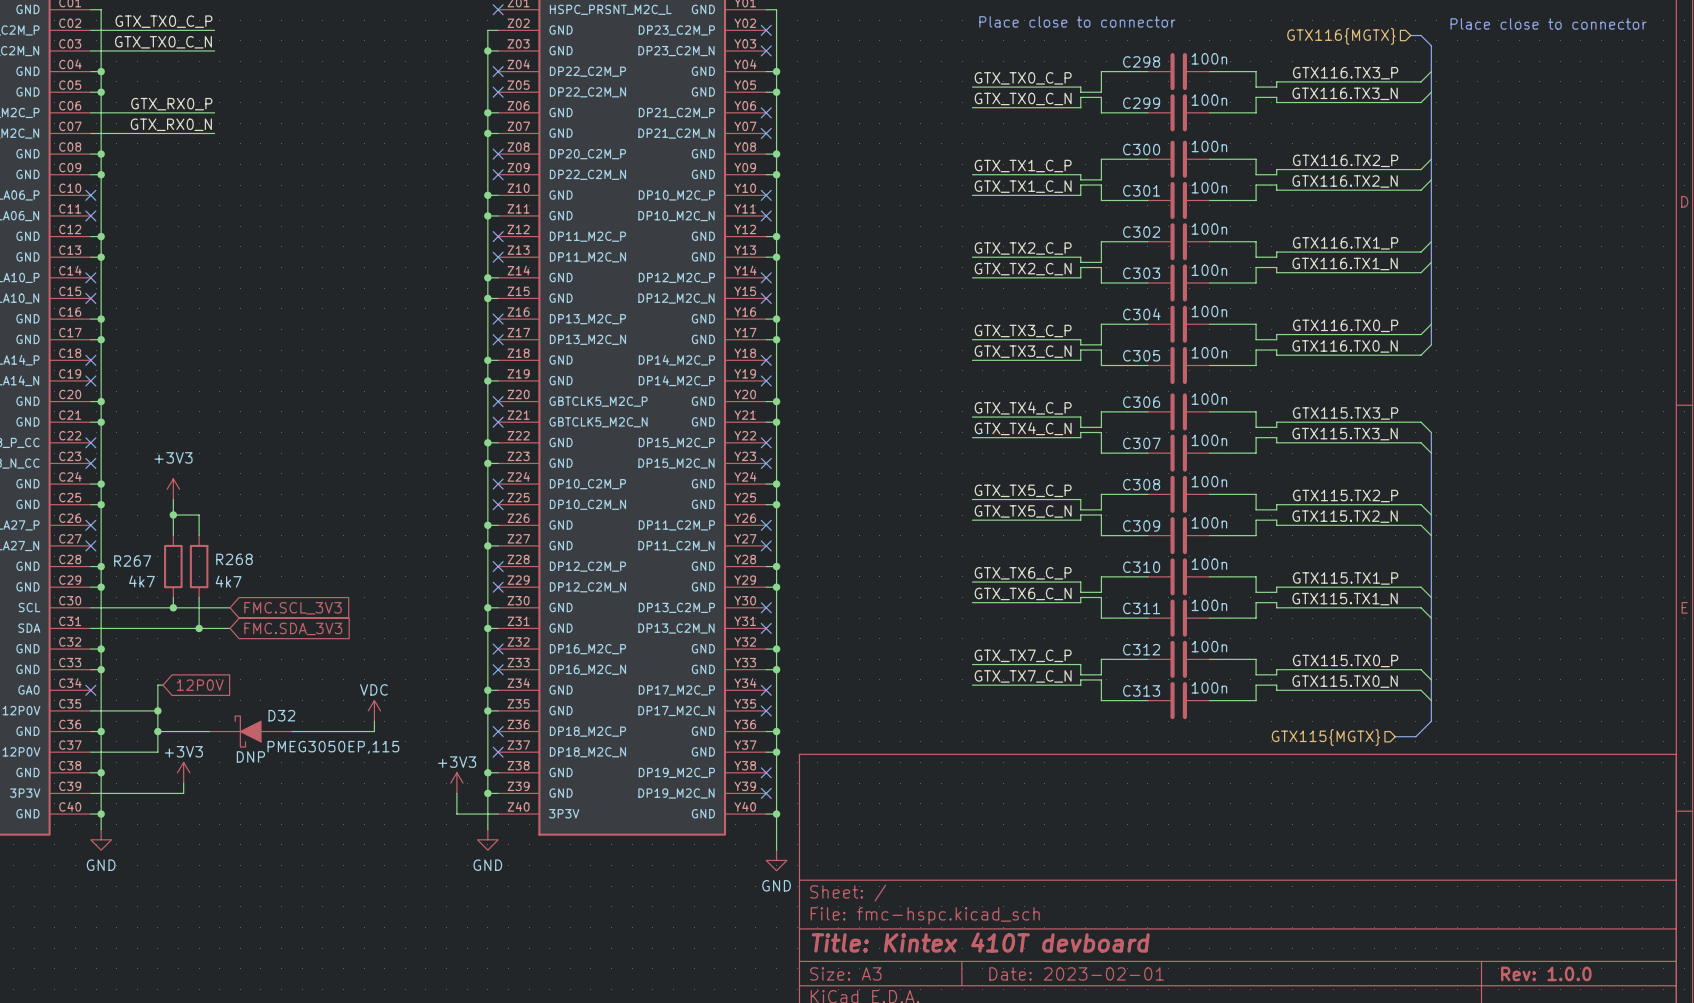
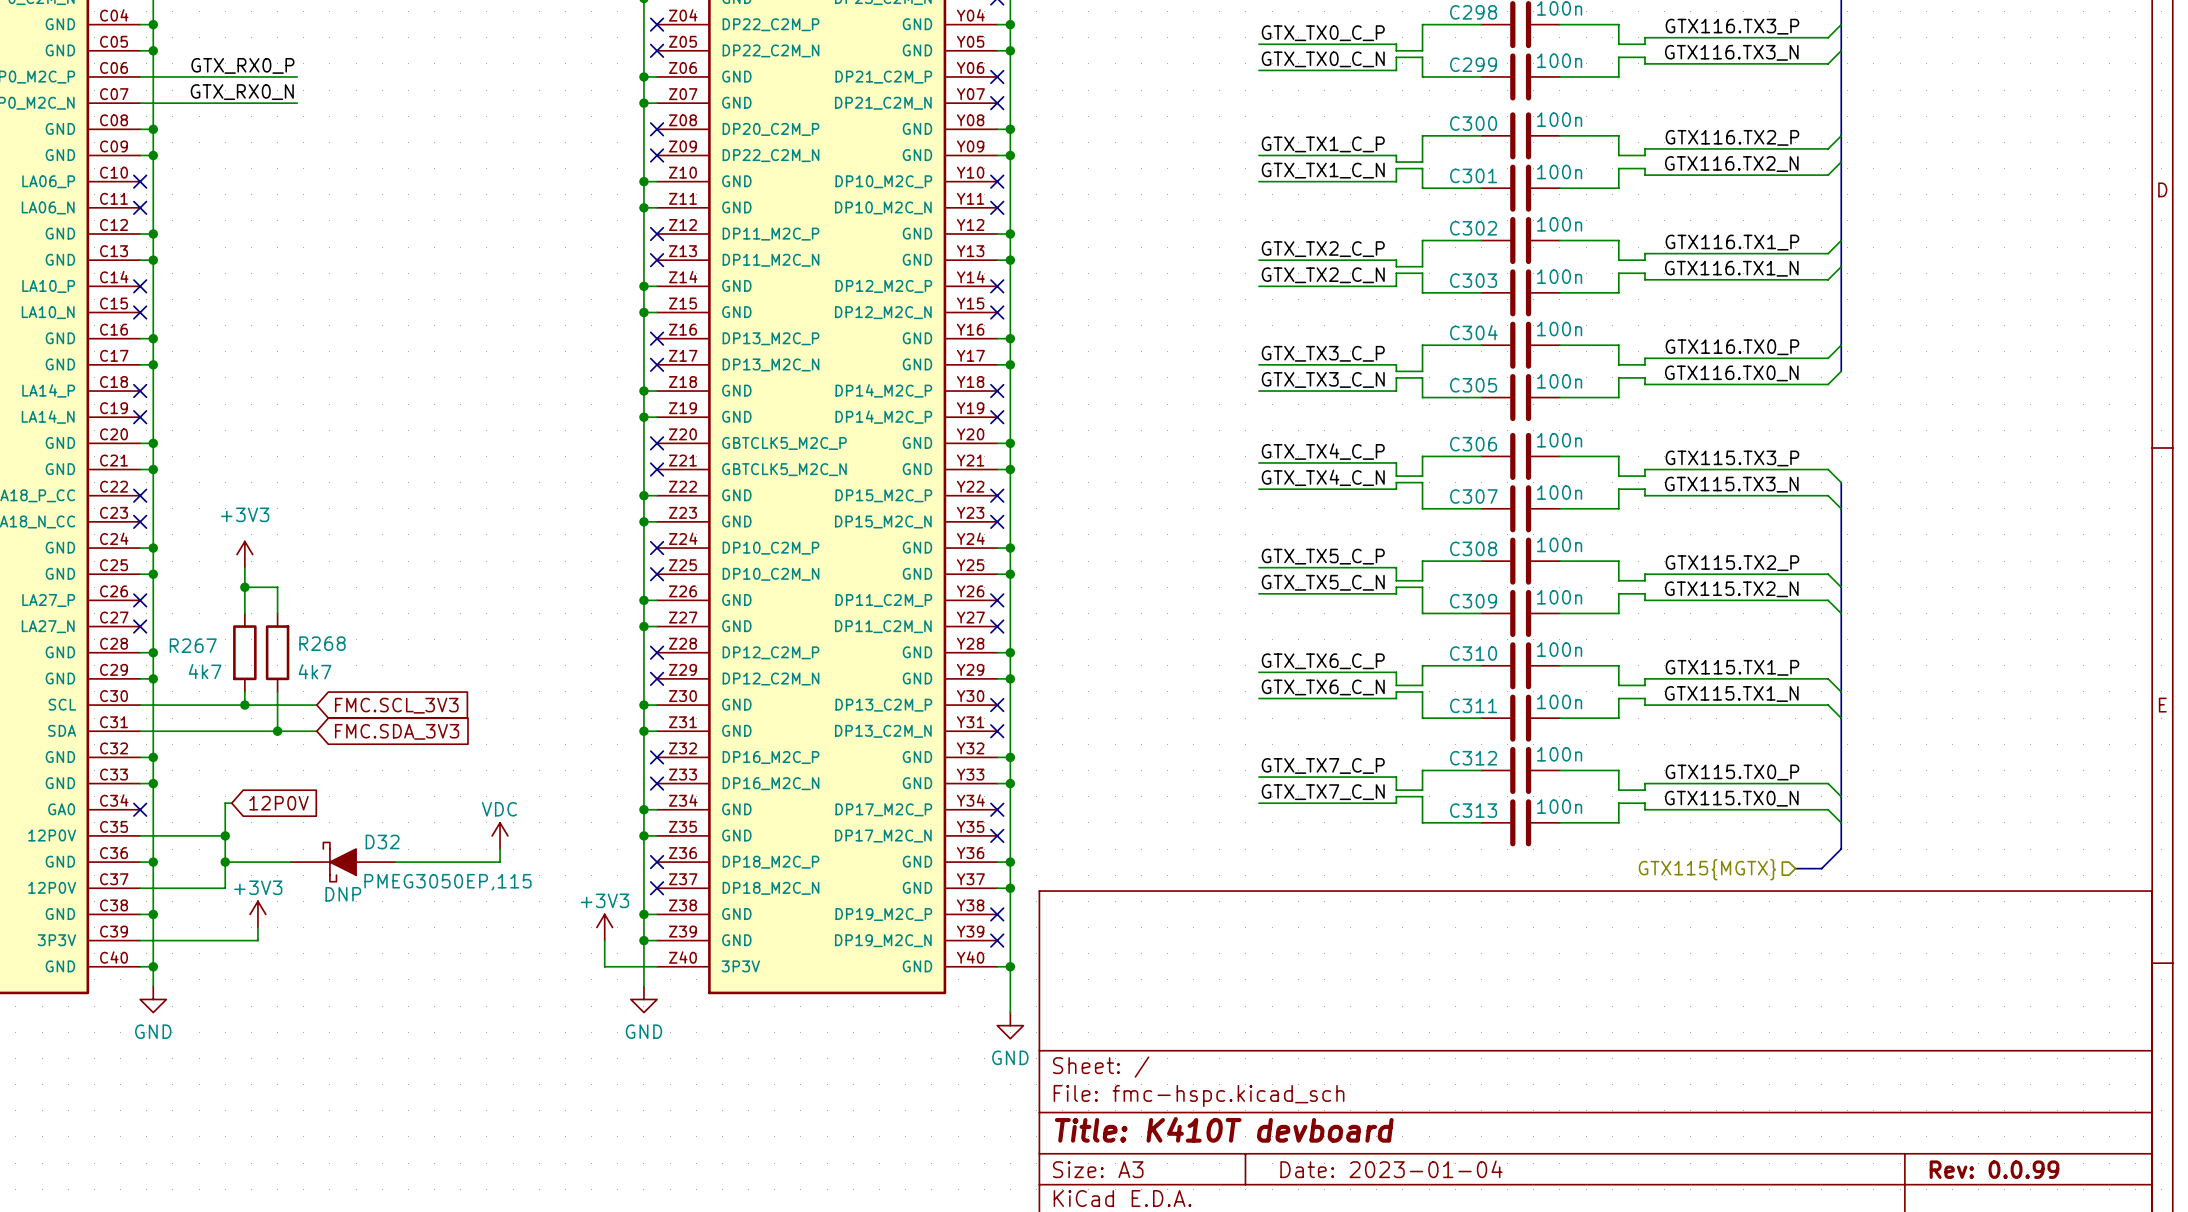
title block: Title: Kintex 410T devboard (980, 942) -> Title: K410T devboard (1224, 1129)
title block: Date: 2023-02-01 (1076, 973) -> Date: 2023-01-04 (1391, 1169)
title block: Rev: 1.0.0 (1546, 973) -> Rev: 0.0.99 (1994, 1169)

